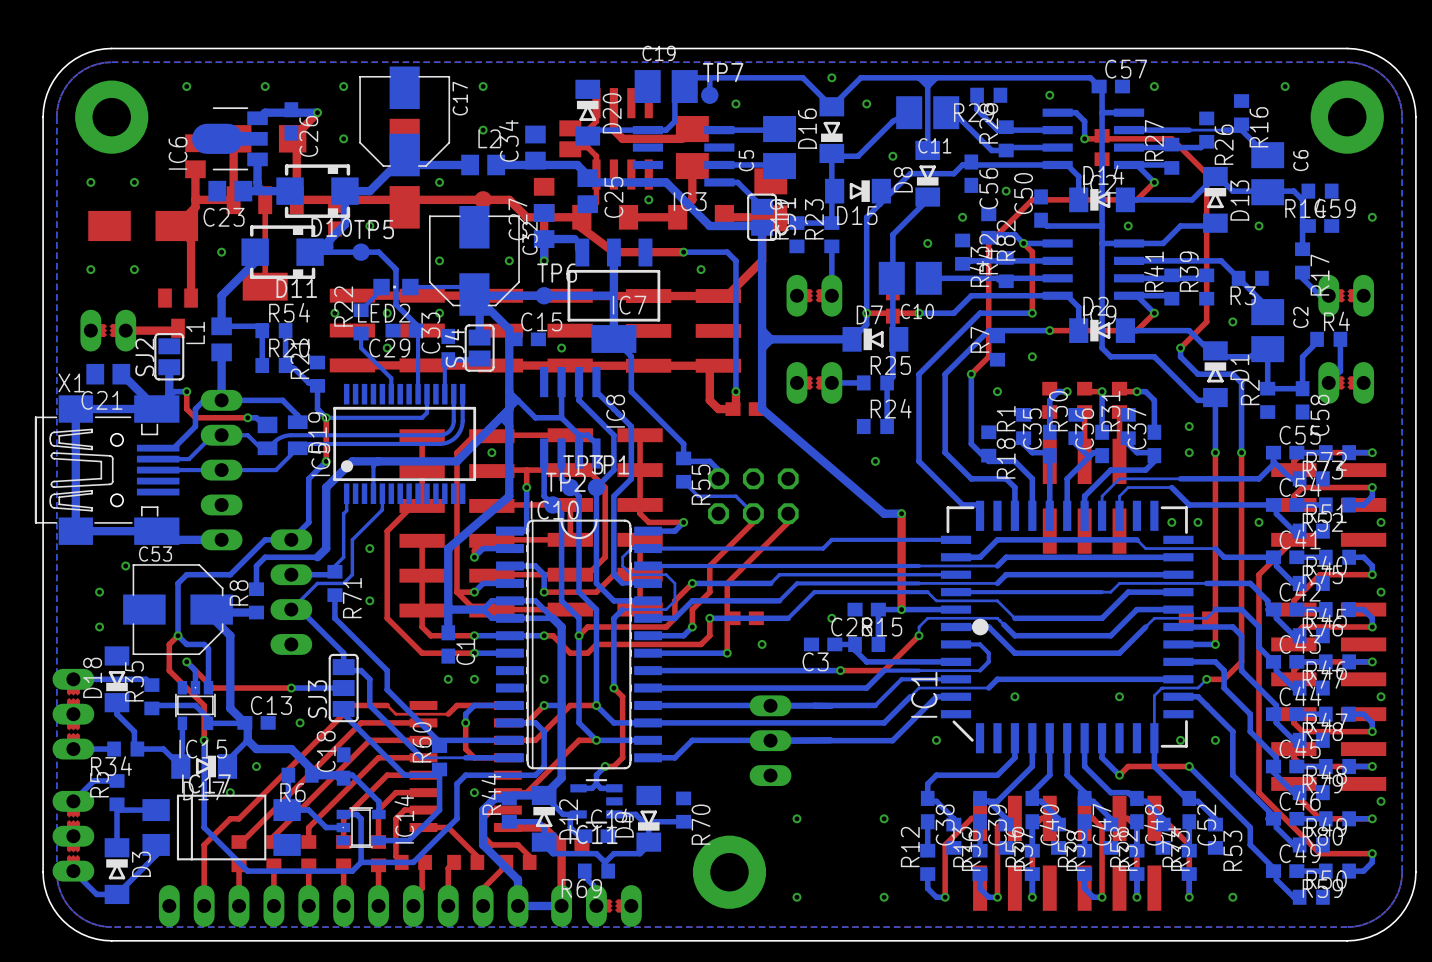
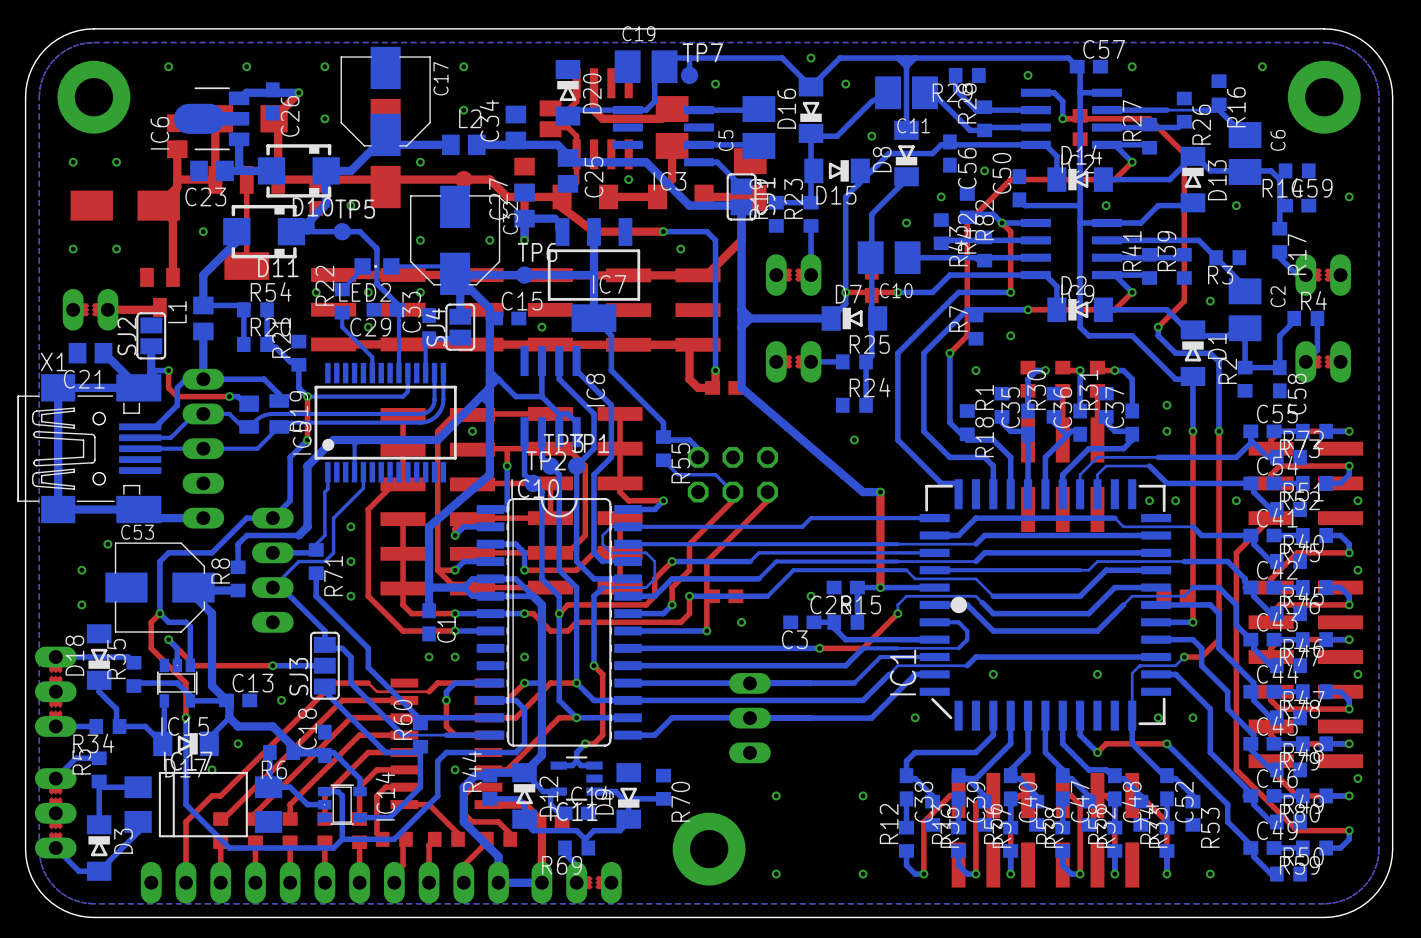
via: none -> (350, 561)
via: (369, 600) -> none
via: none -> (350, 596)

